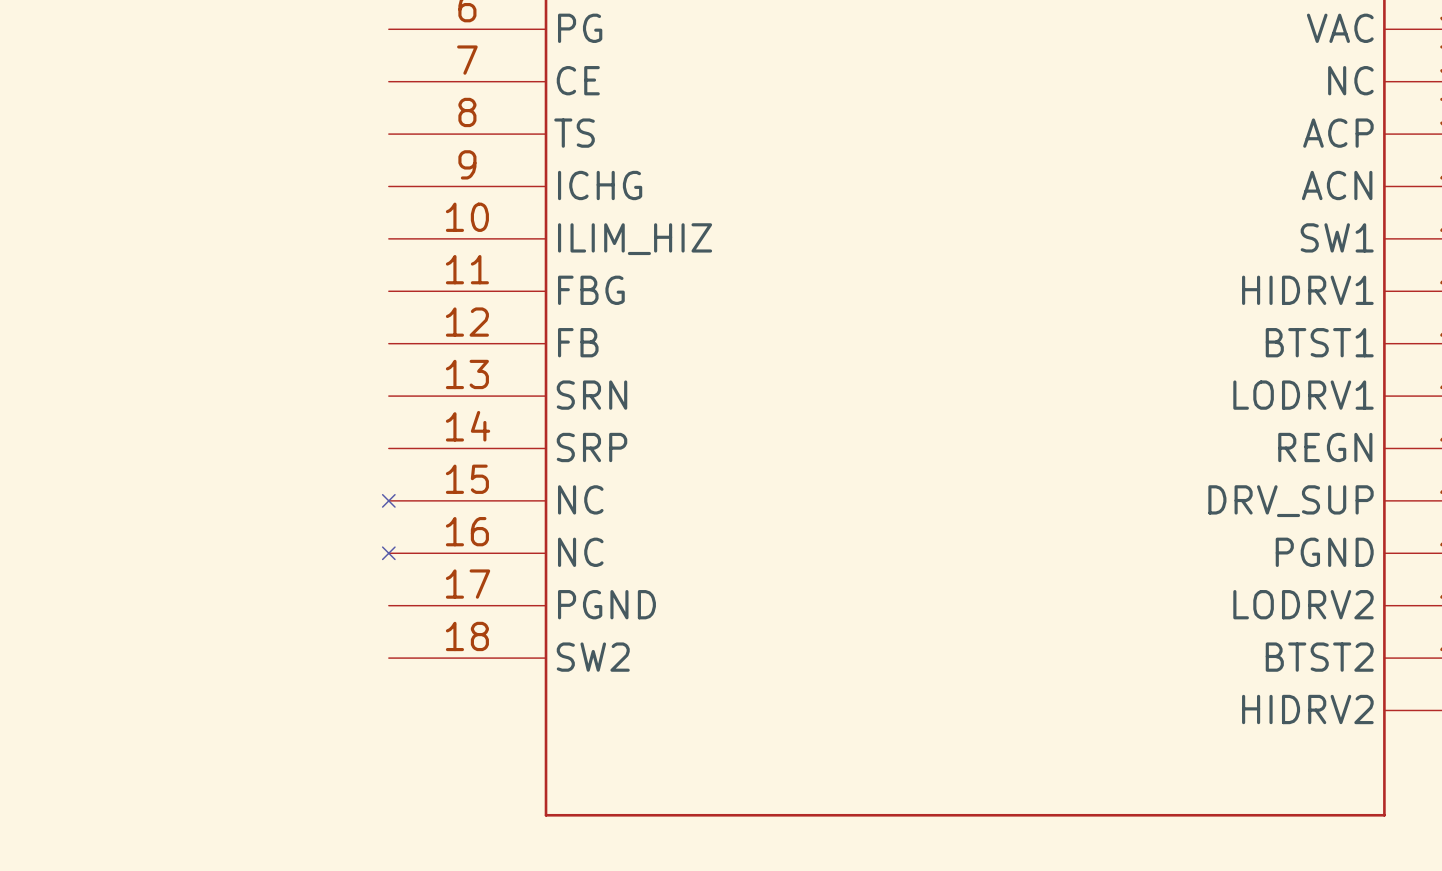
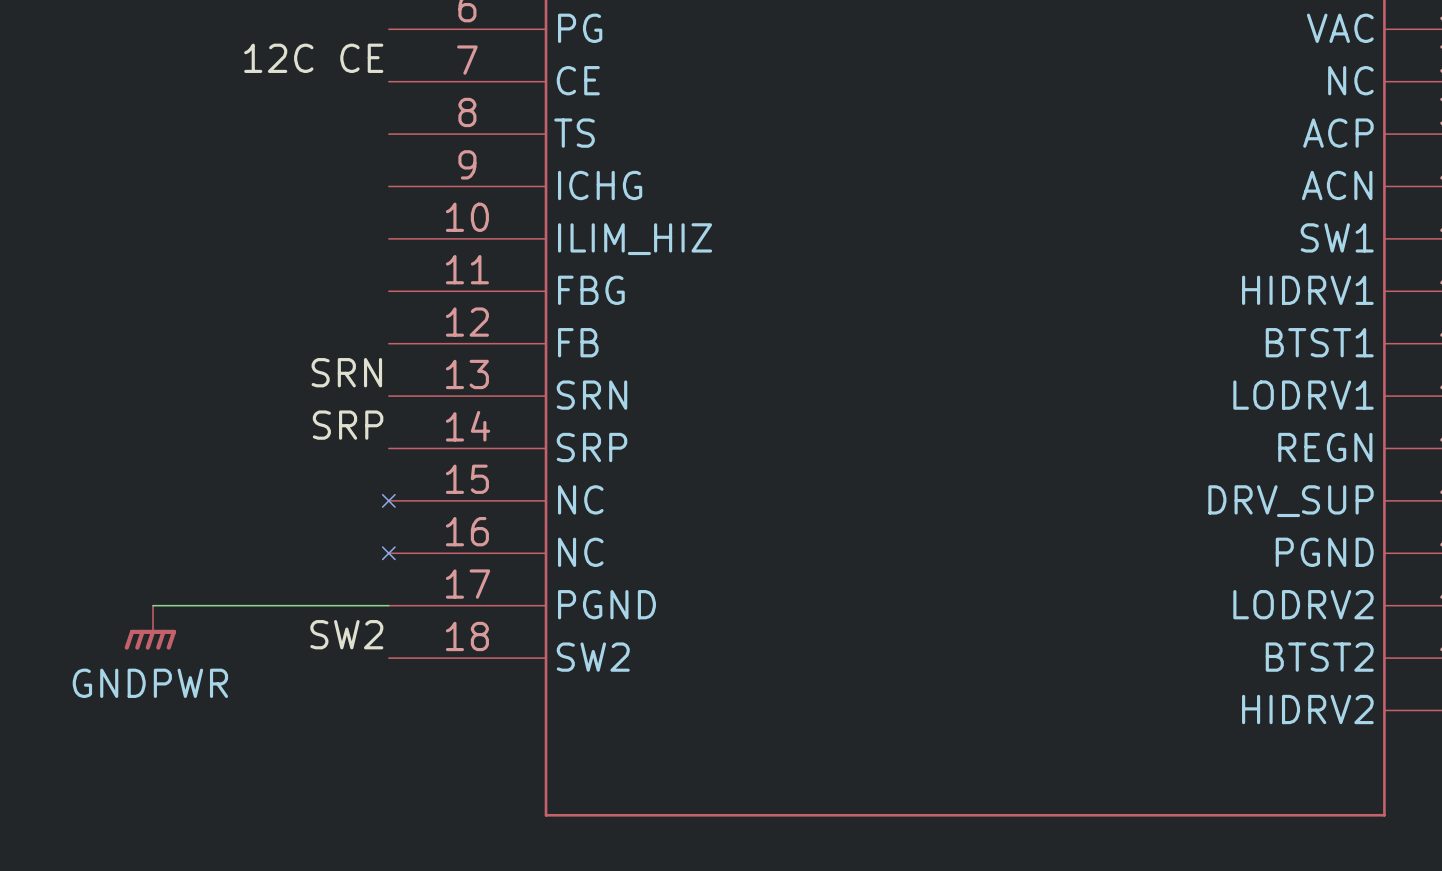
label: none -> 12C CE (313, 58)
label: none -> SRN (346, 372)
label: none -> SRP (348, 425)
wire: none -> (153, 605) (388, 605)
power symbol: none -> GNDPWR (150, 627)
label: none -> SW2 (346, 634)

